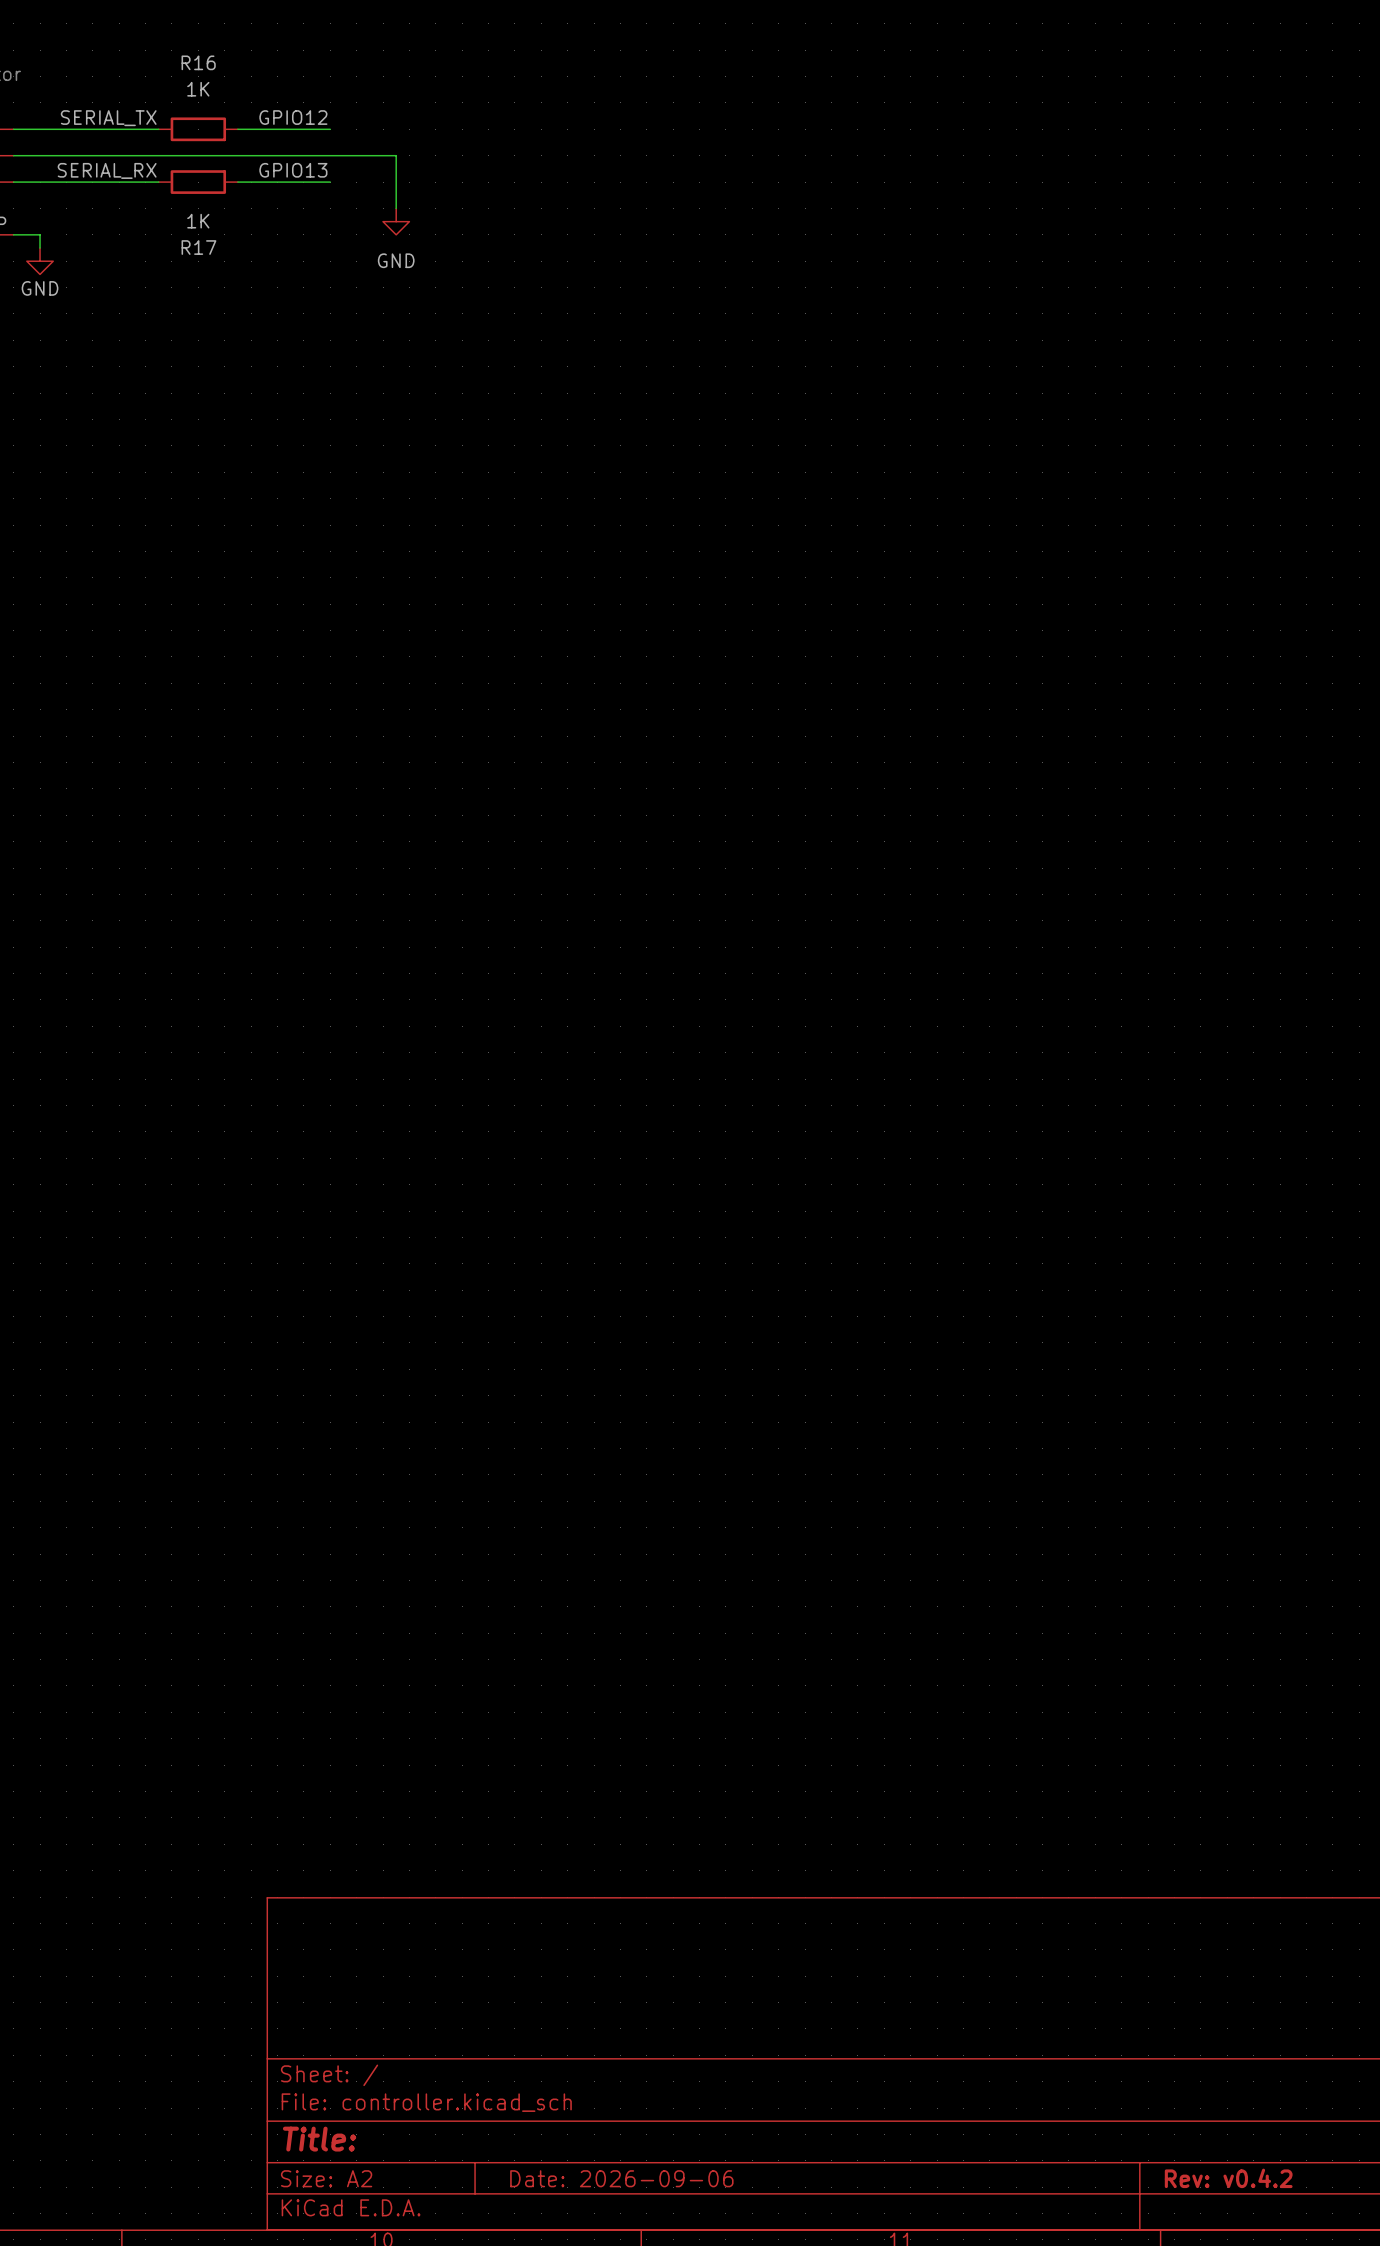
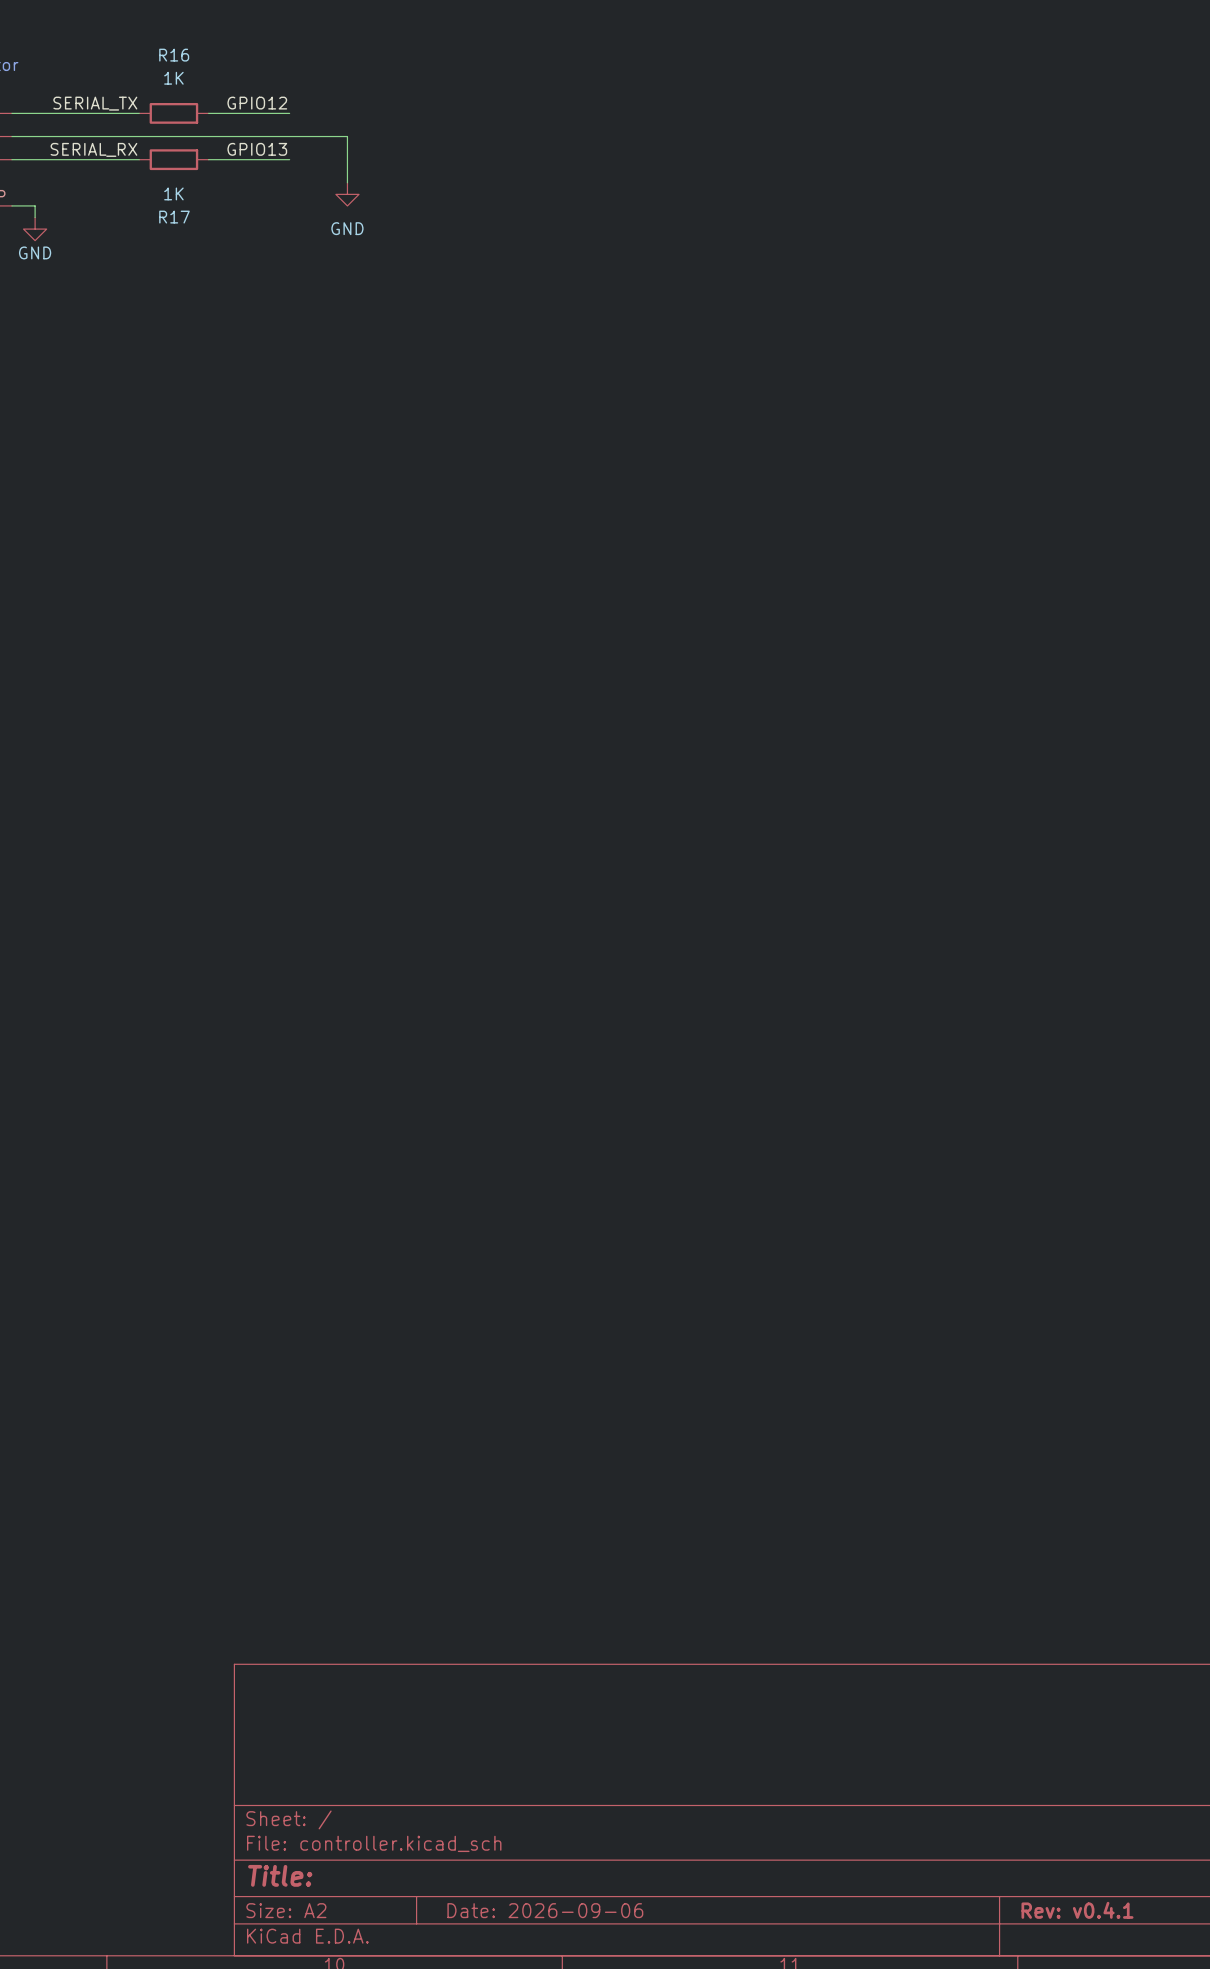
title block: Rev: v0.4.2 (1228, 2178) -> Rev: v0.4.1 (1077, 1910)

